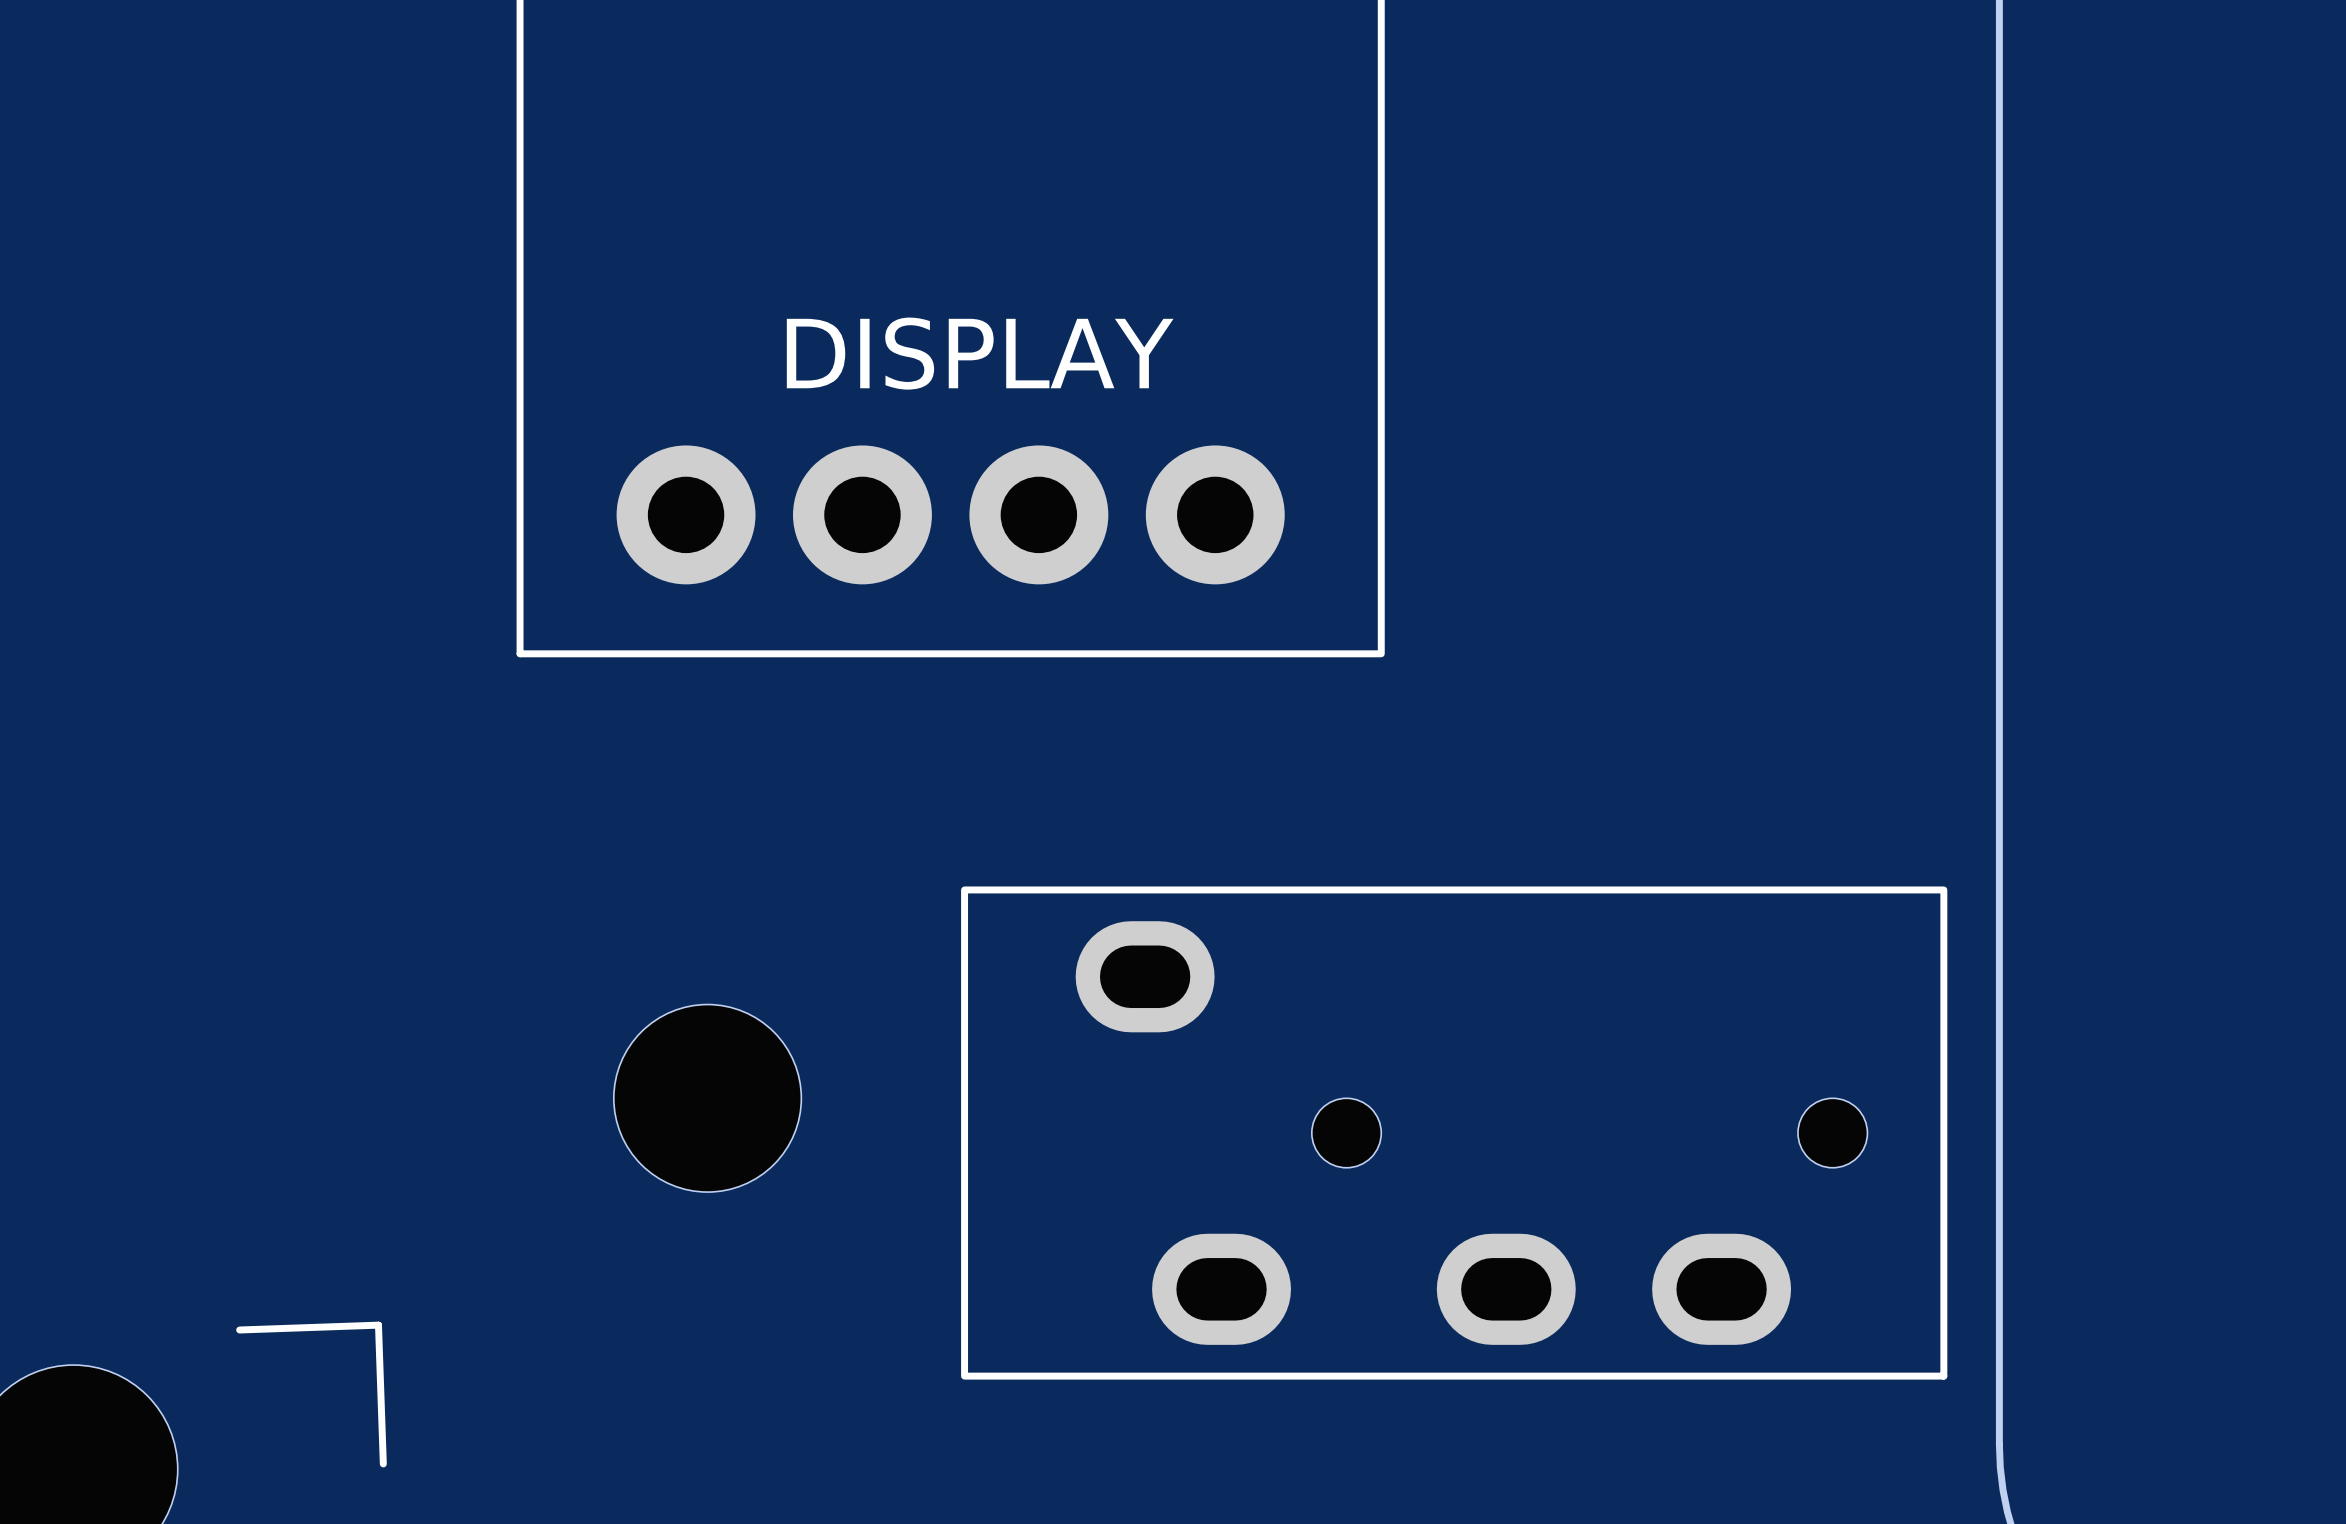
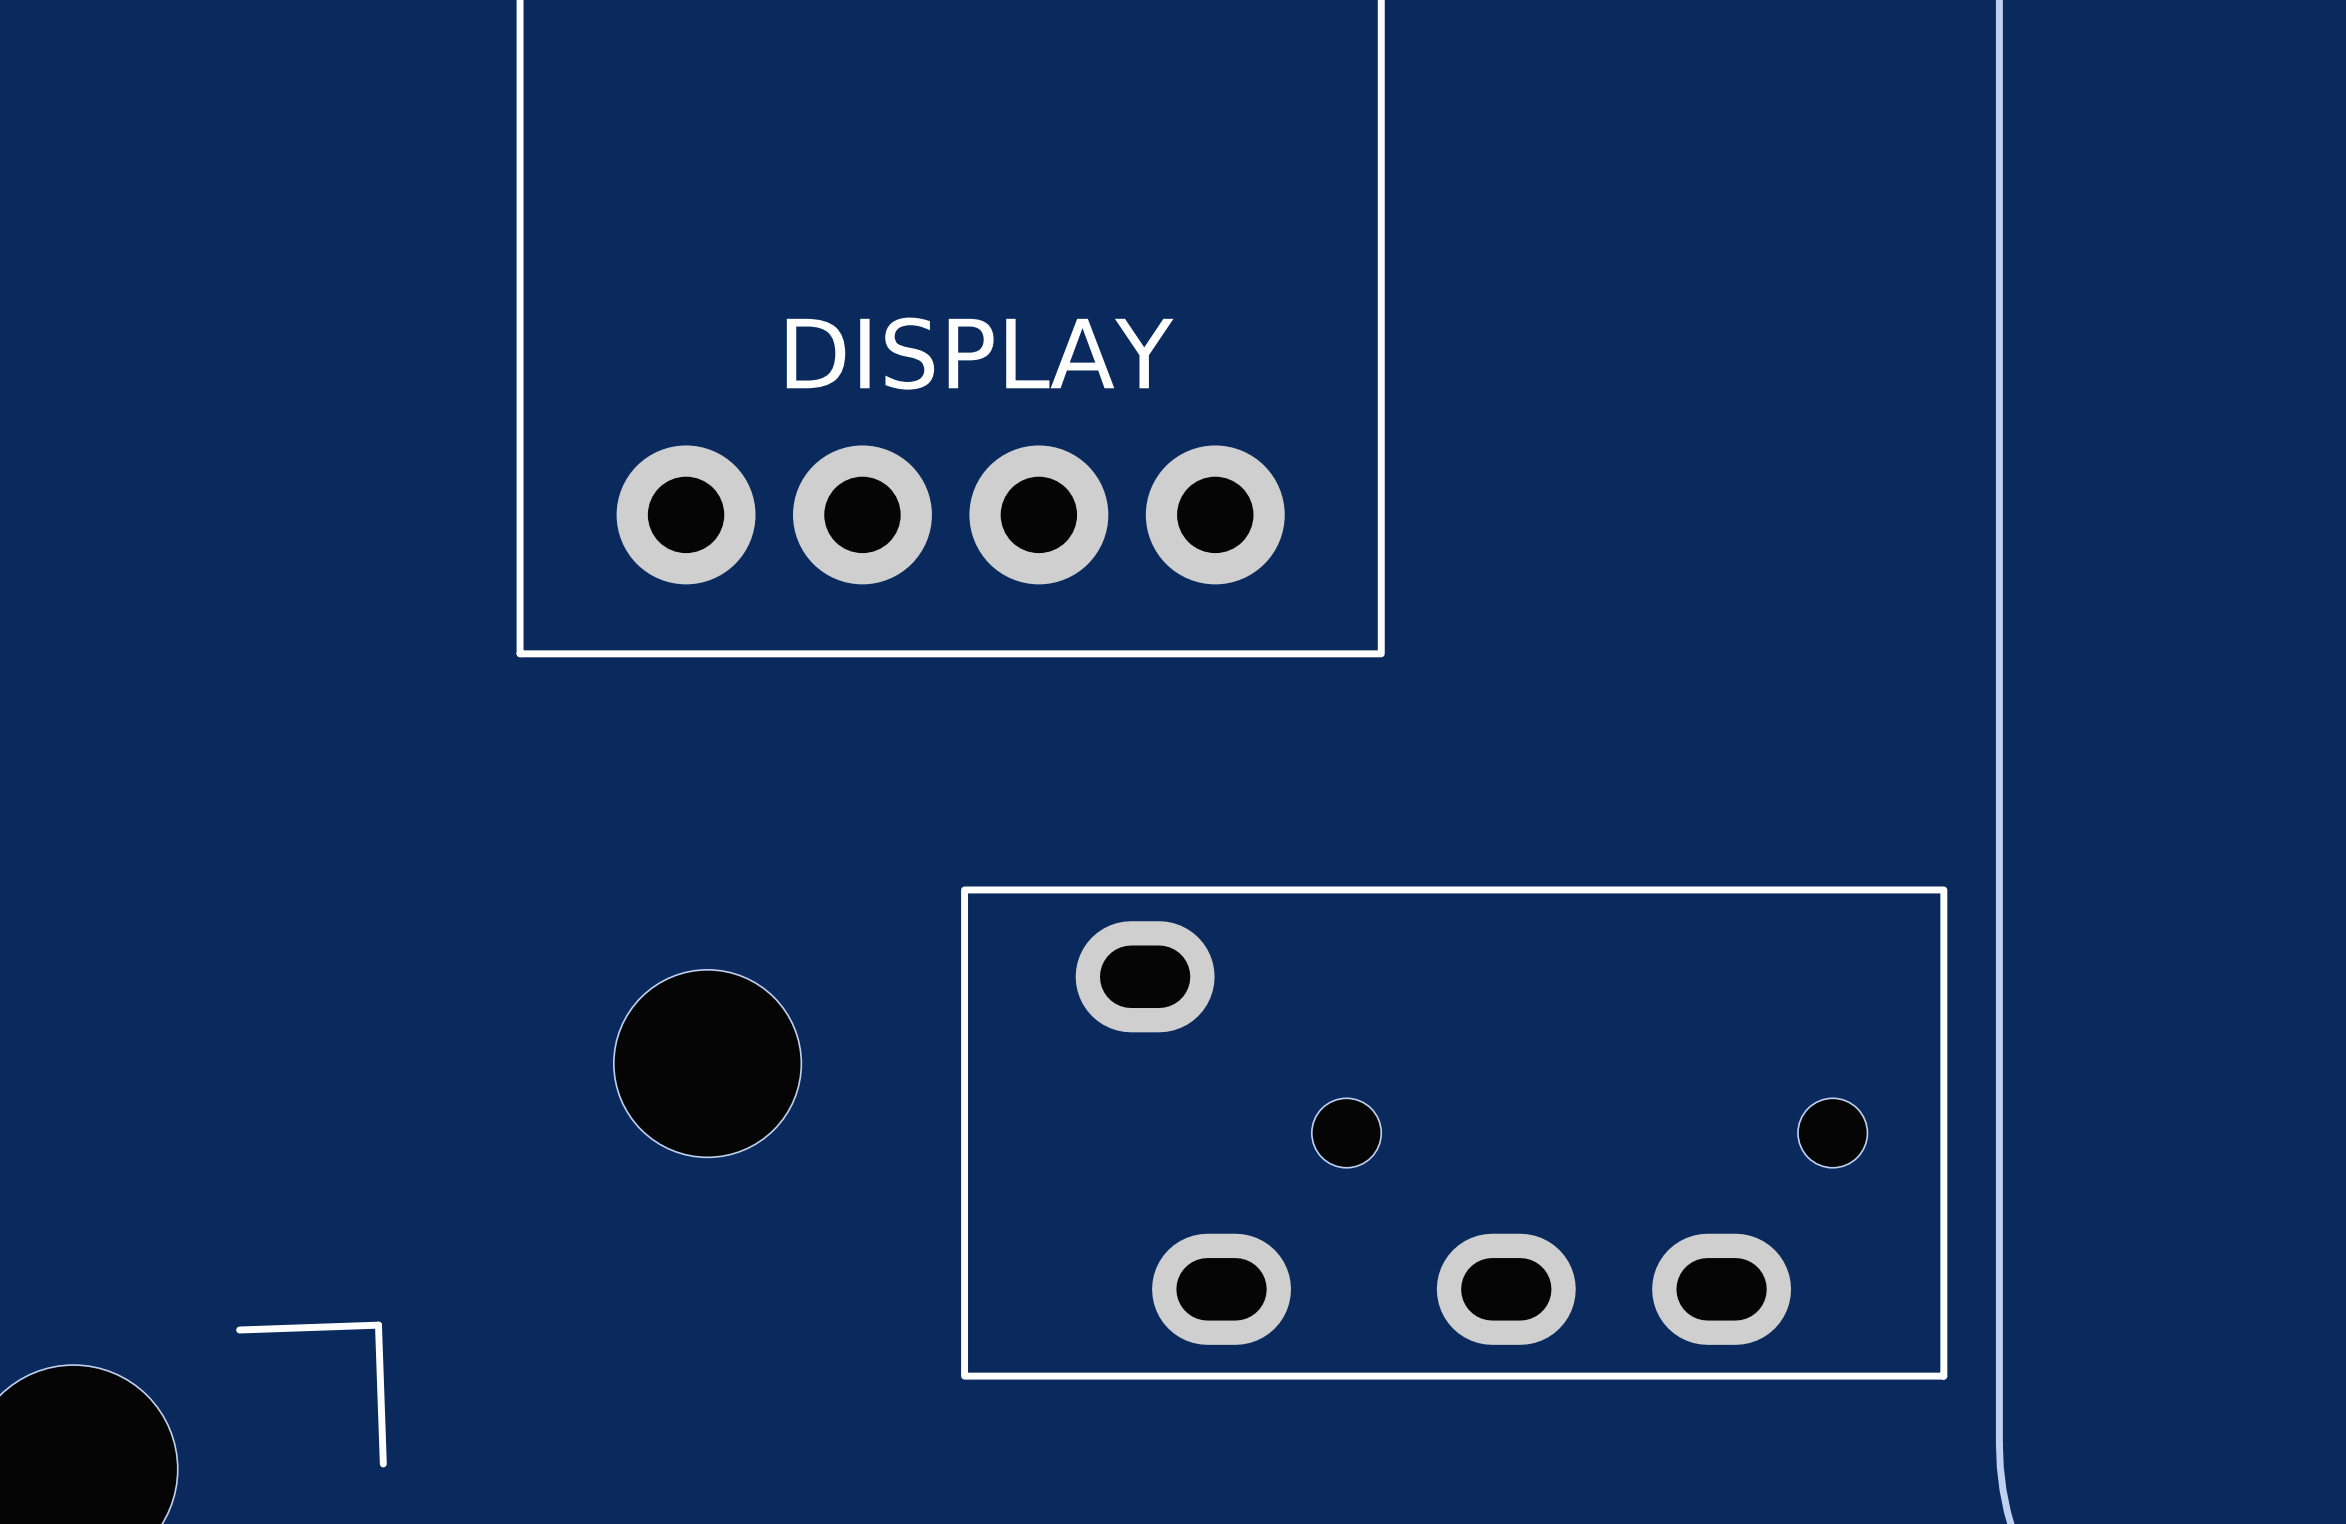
part position: (707, 1098) -> (707, 1063)

